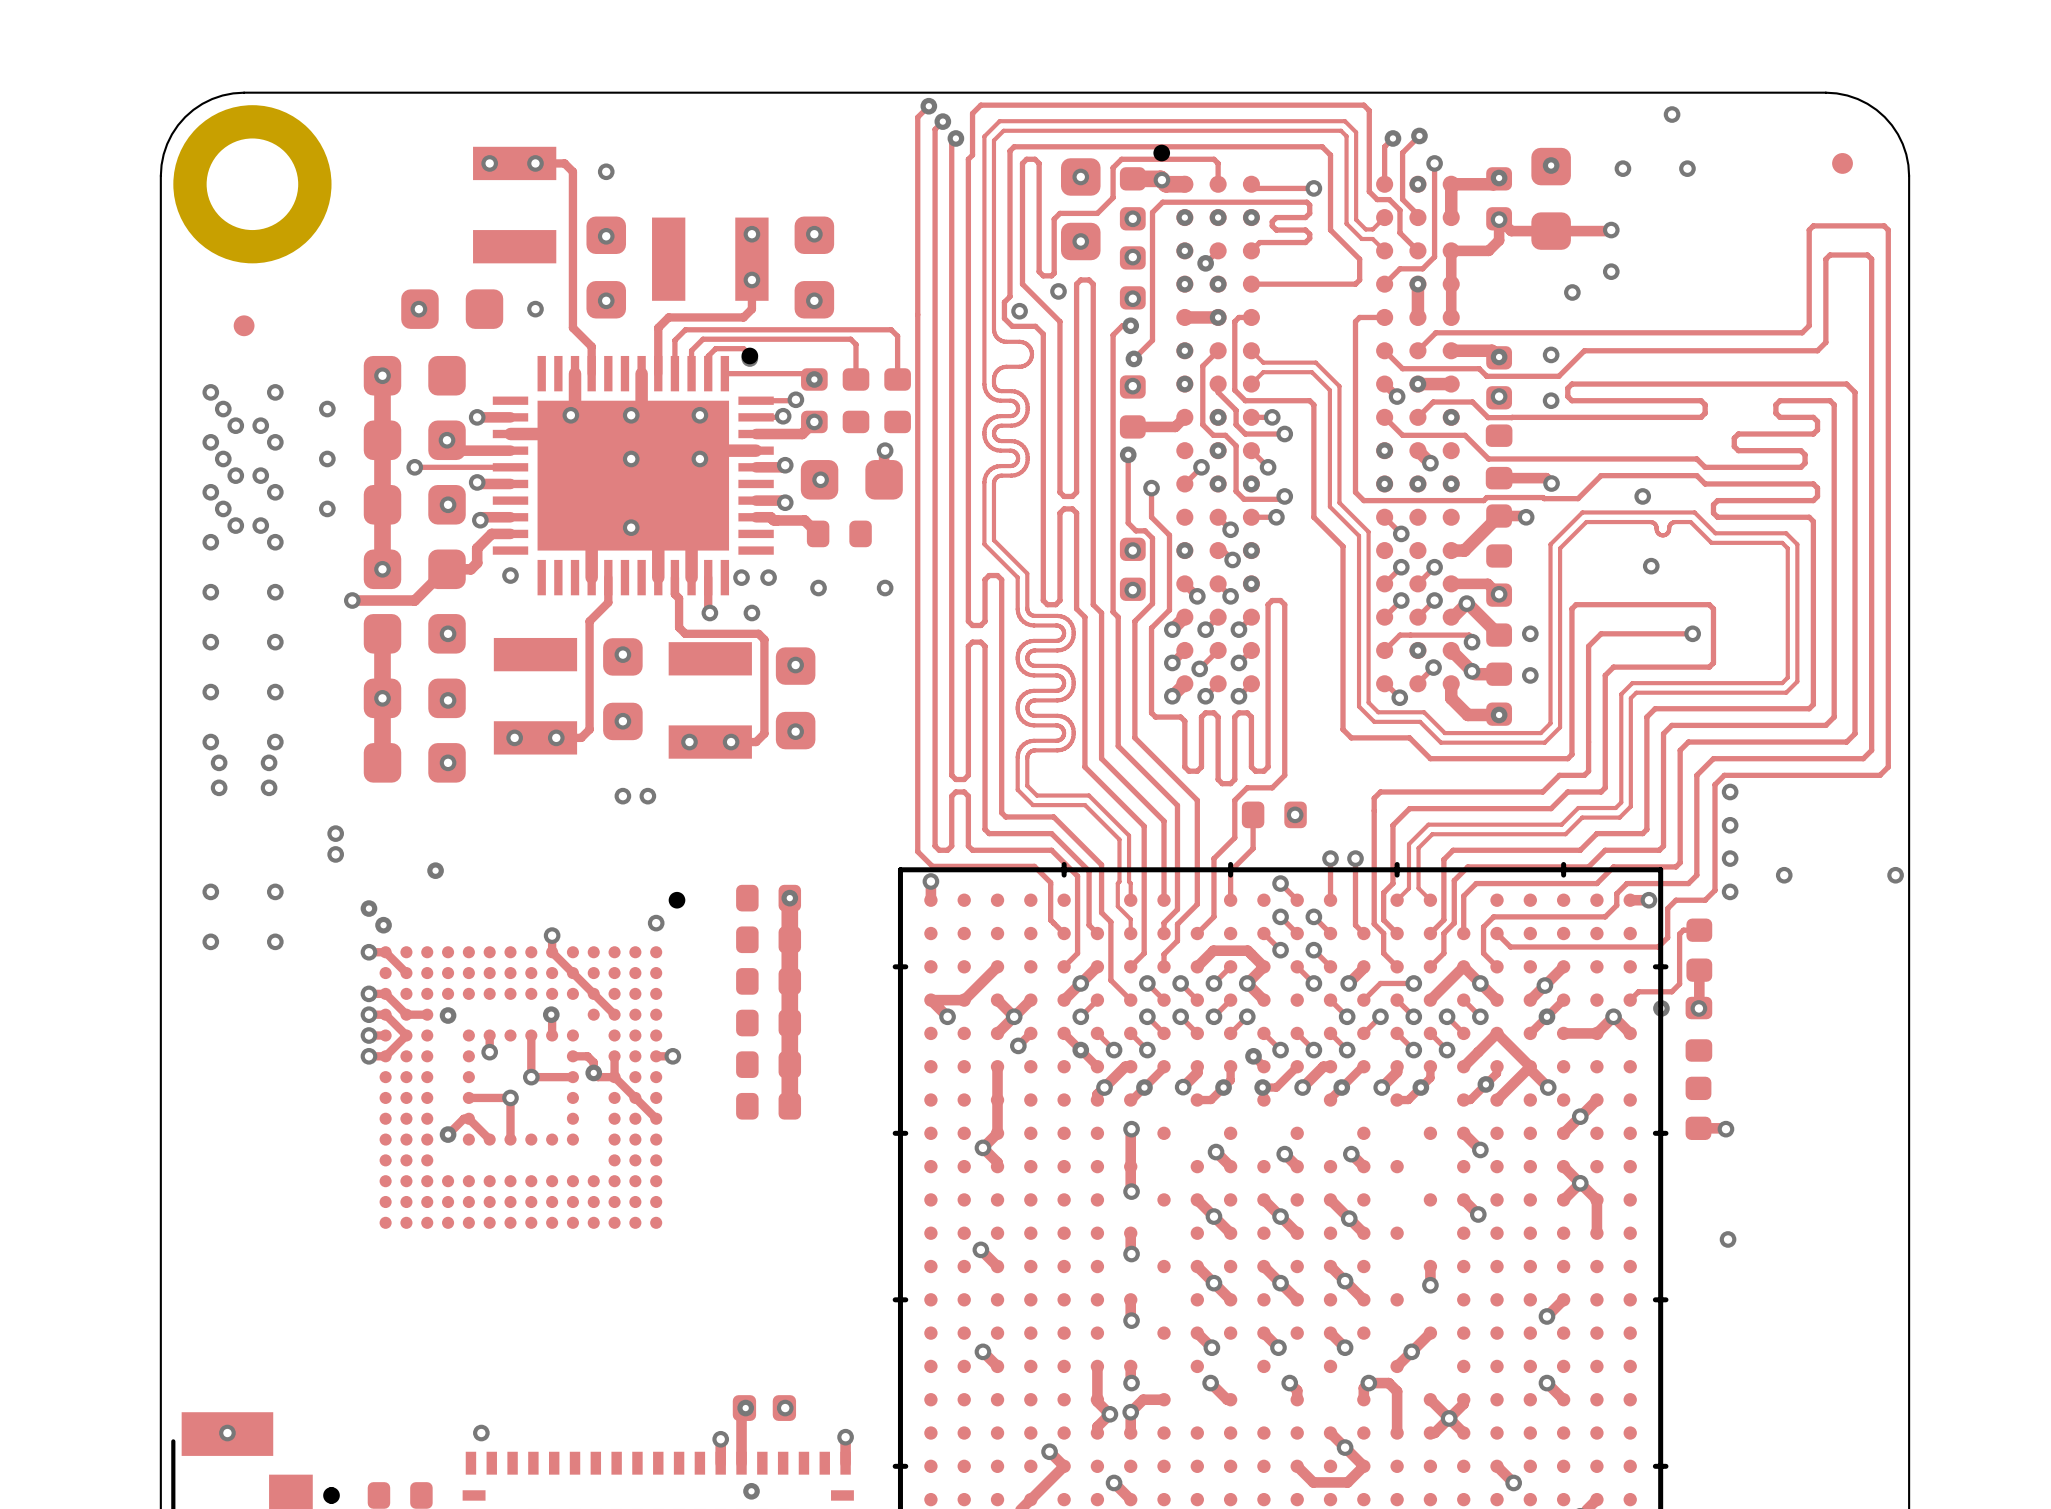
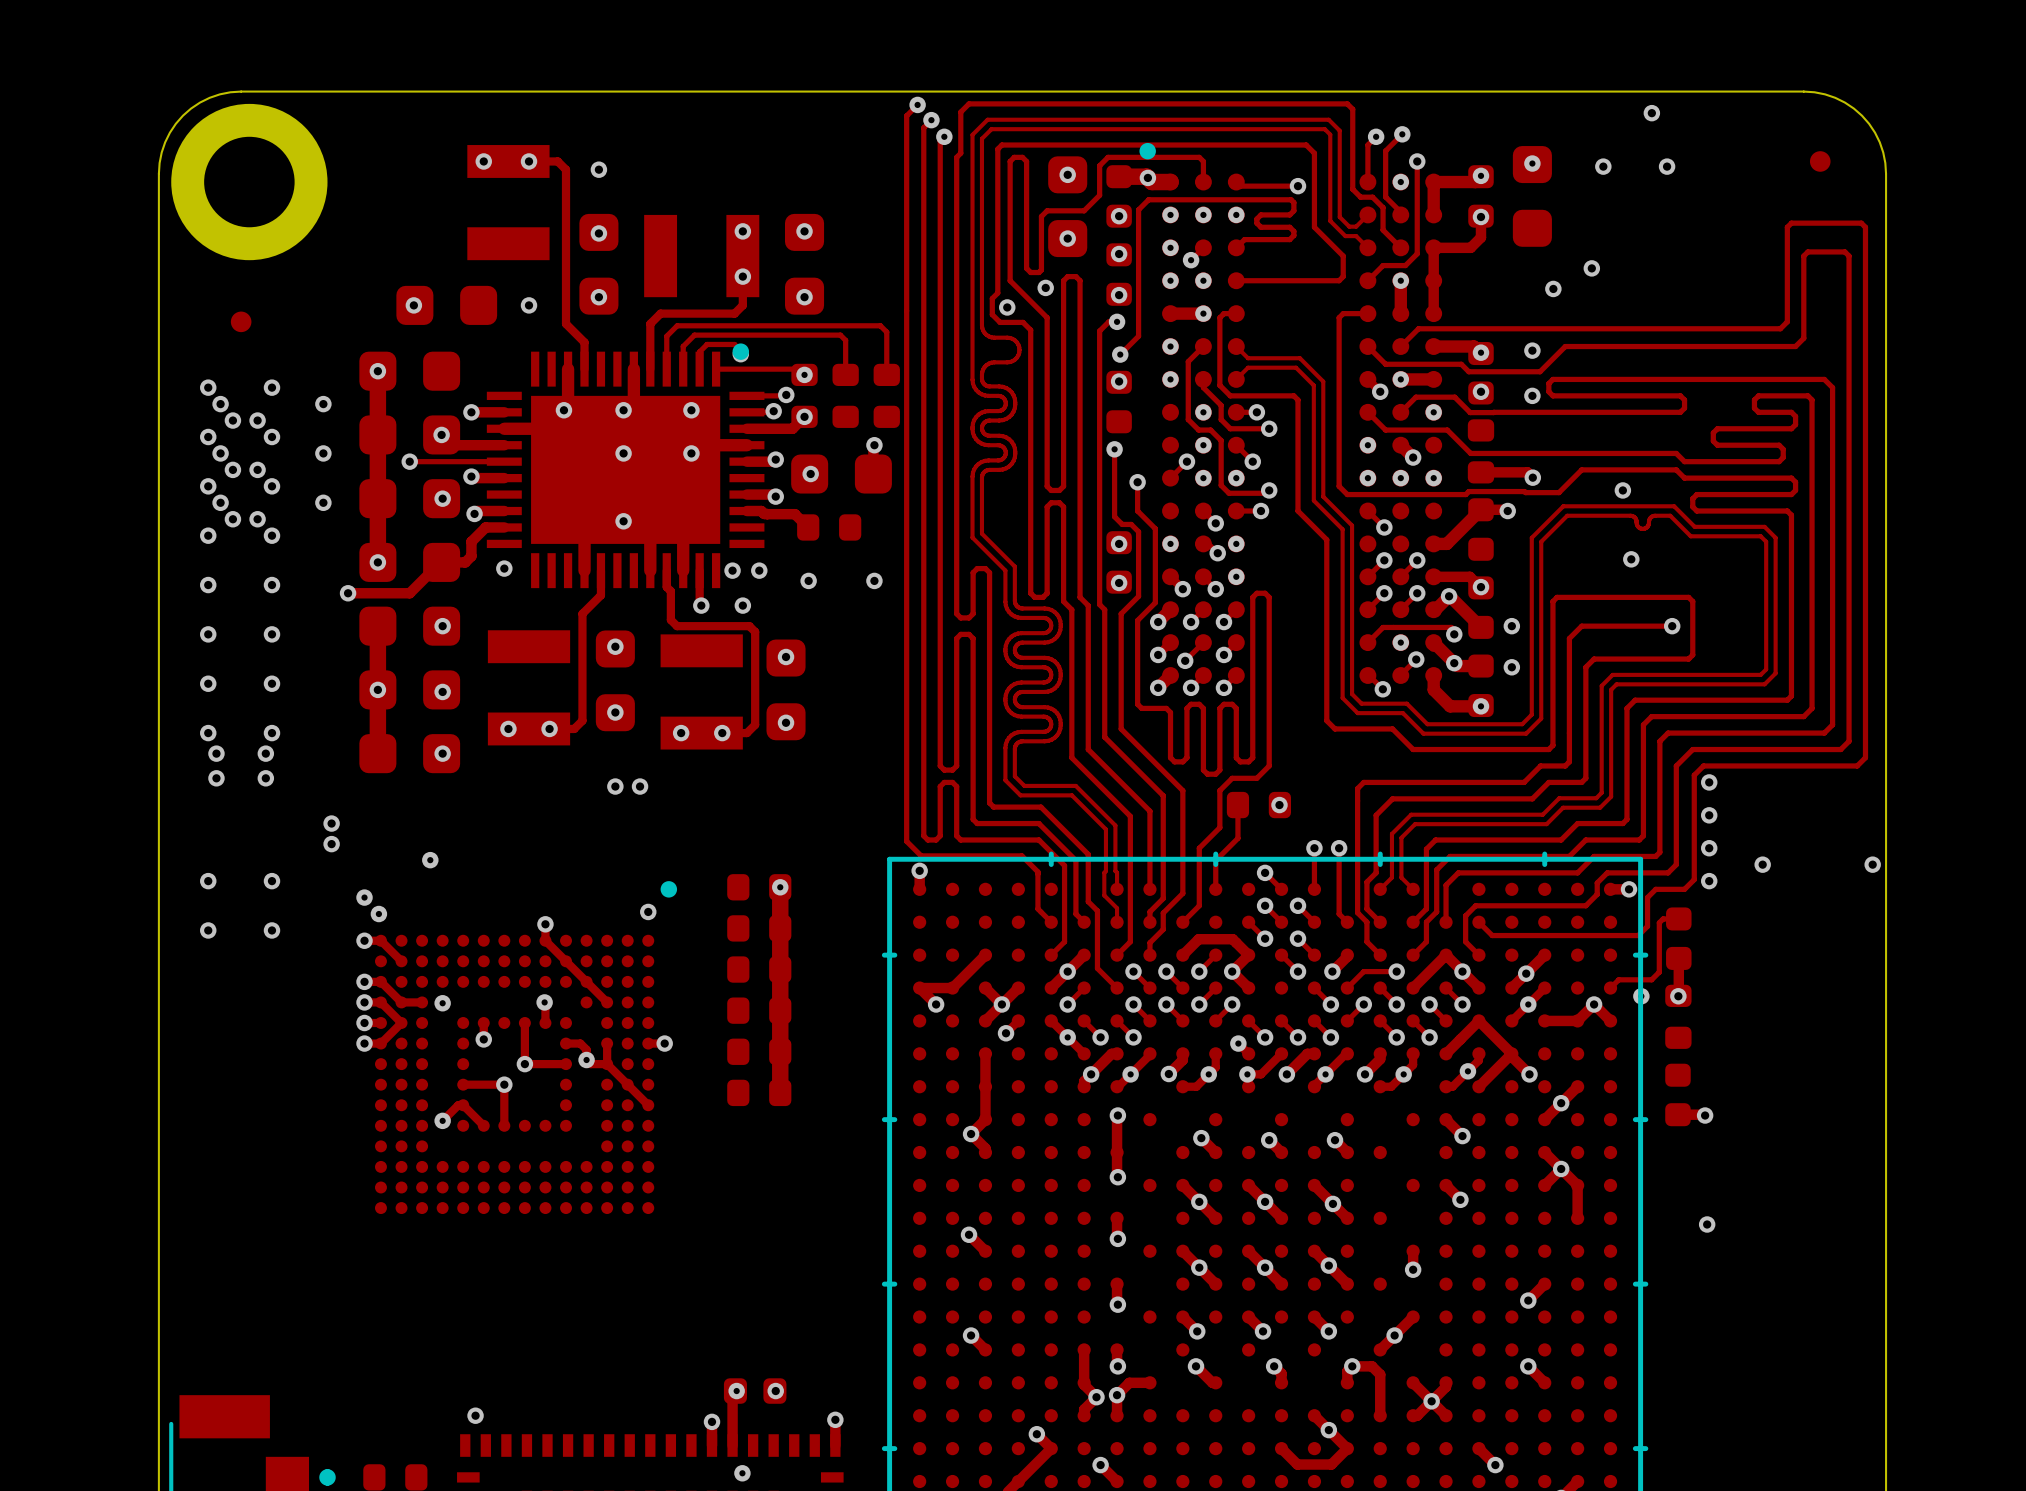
track: (1499, 218) (1511, 231) (1611, 230) -> none
via: (1611, 230) -> none
track: (1184, 417) (1175, 426) (1132, 426) -> none
via: (227, 1433) -> none

